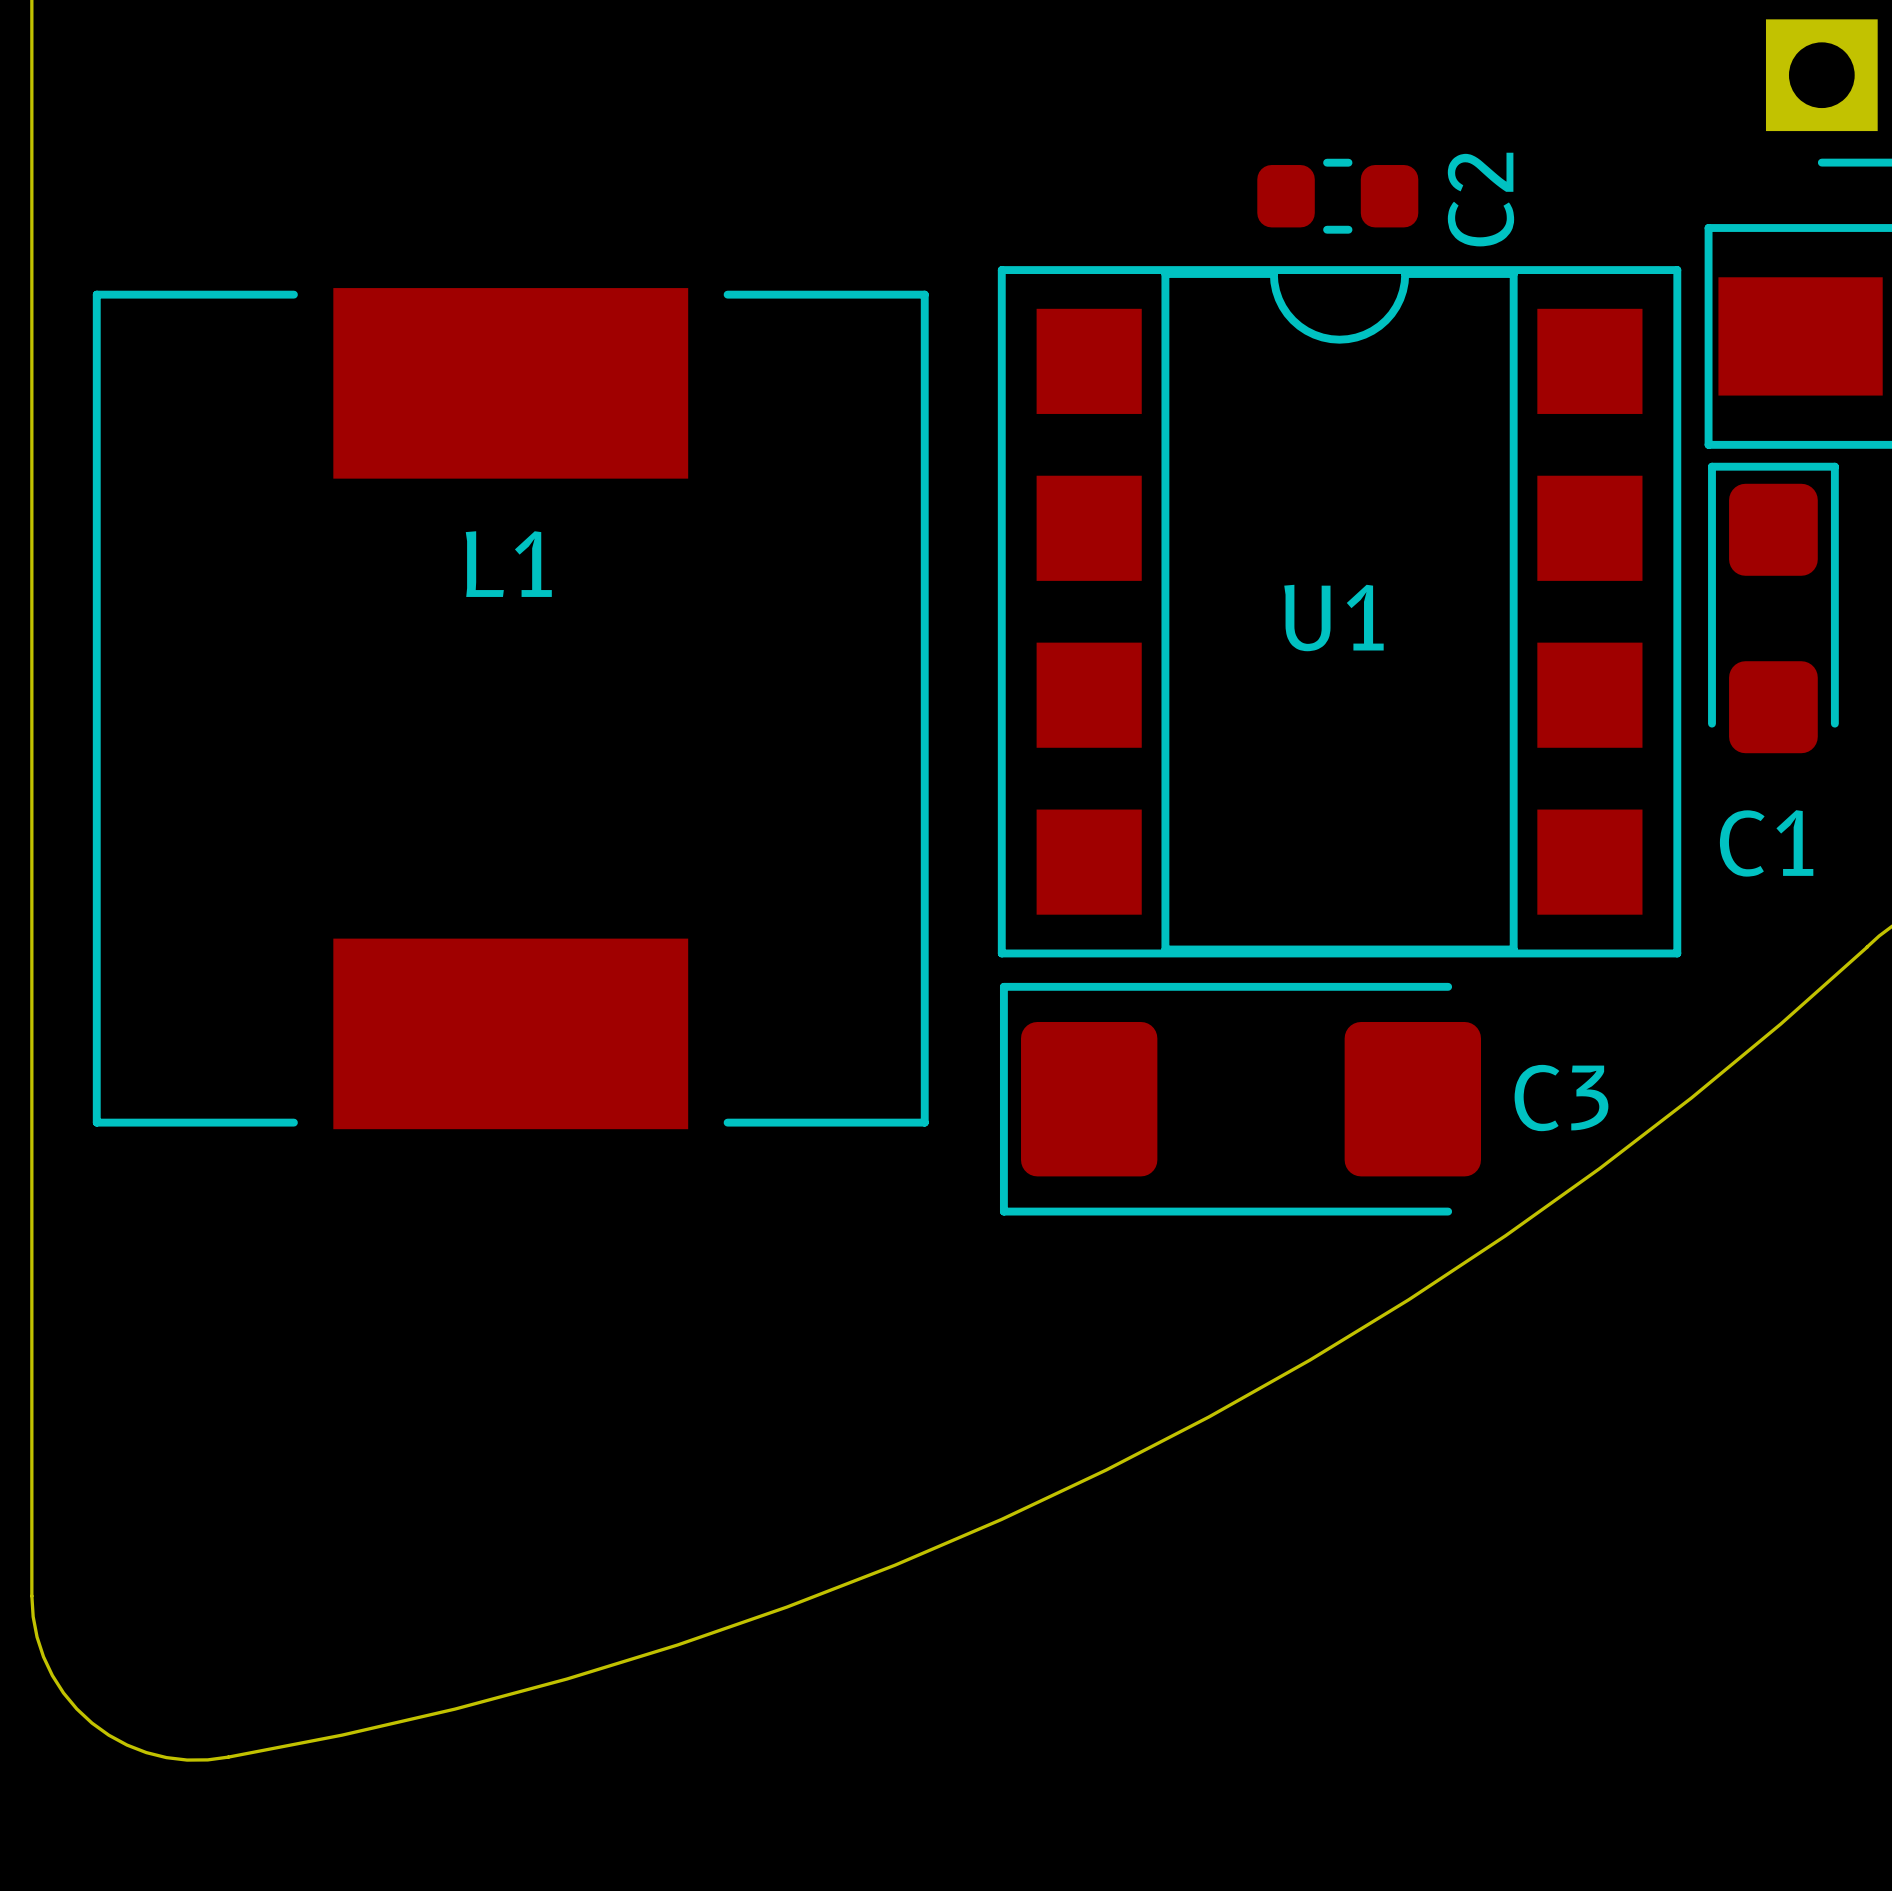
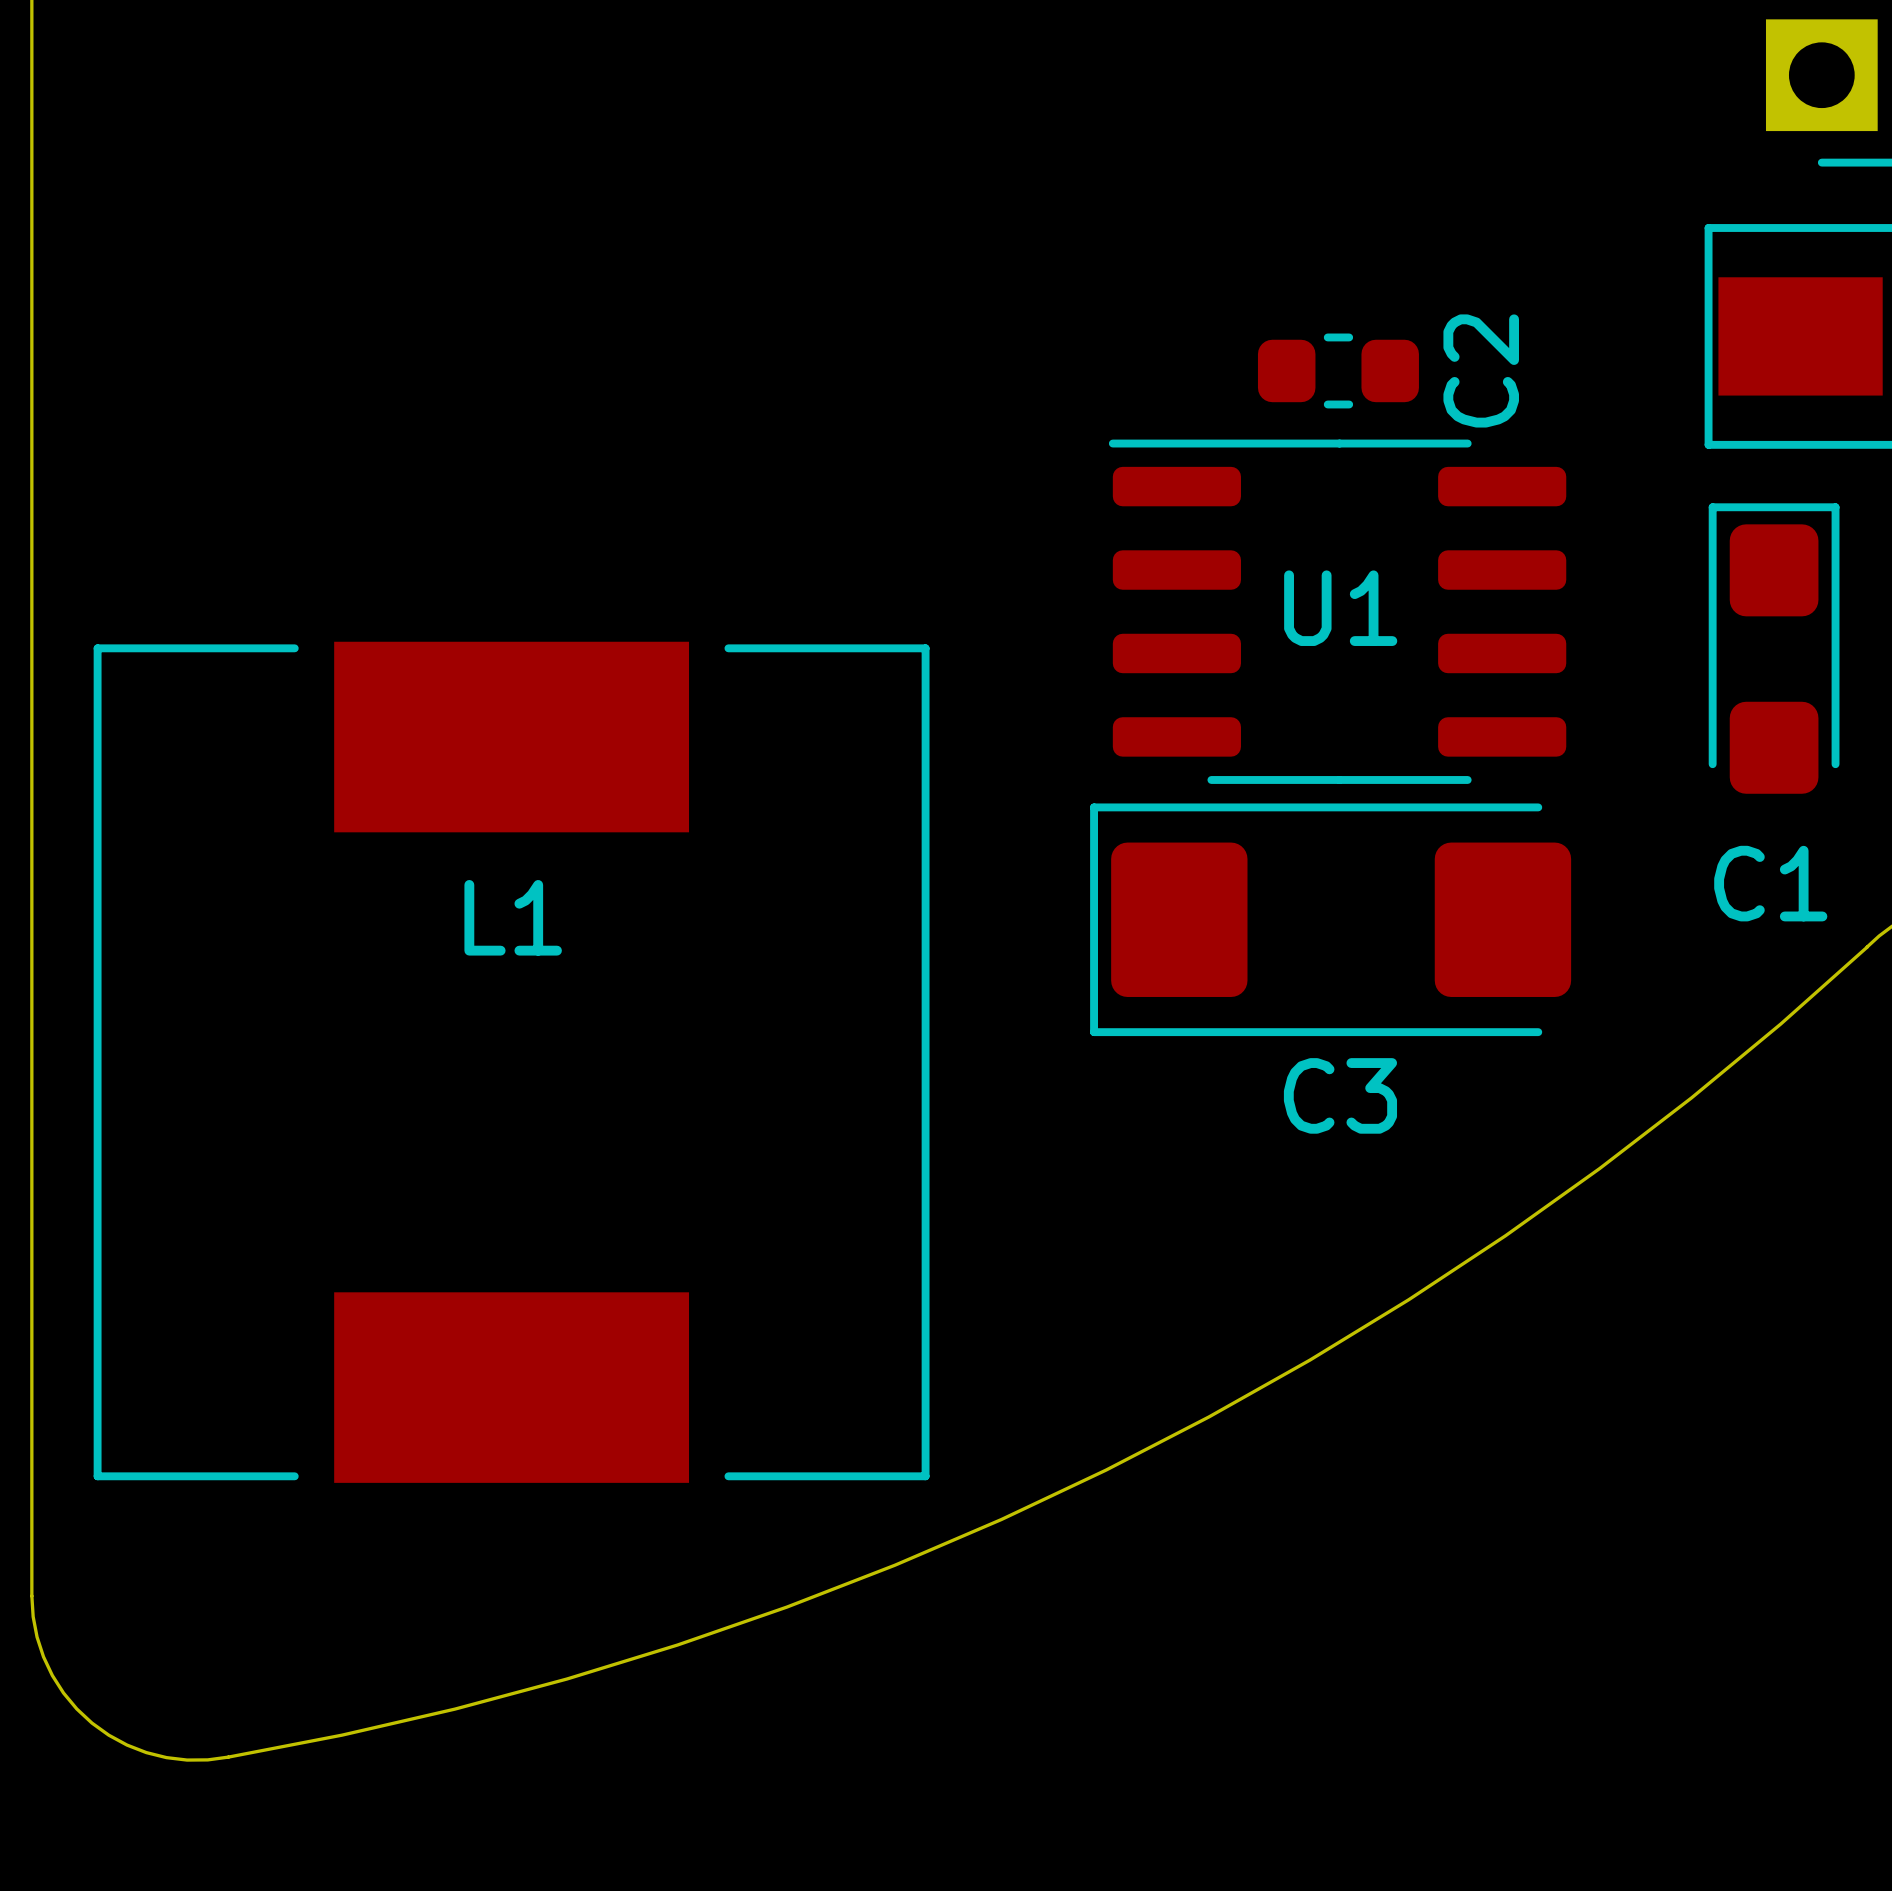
C2 position: (1337, 196) -> (1338, 370)
U1 footprint: [997, 266, 1682, 958] -> [1108, 439, 1567, 784]
C1 position: (1773, 607) -> (1774, 648)
L1 position: (510, 708) -> (511, 1062)
C3 name position: C3 (1561, 1098) -> C3 (1340, 1095)
C3 position: (1240, 1099) -> (1330, 919)

